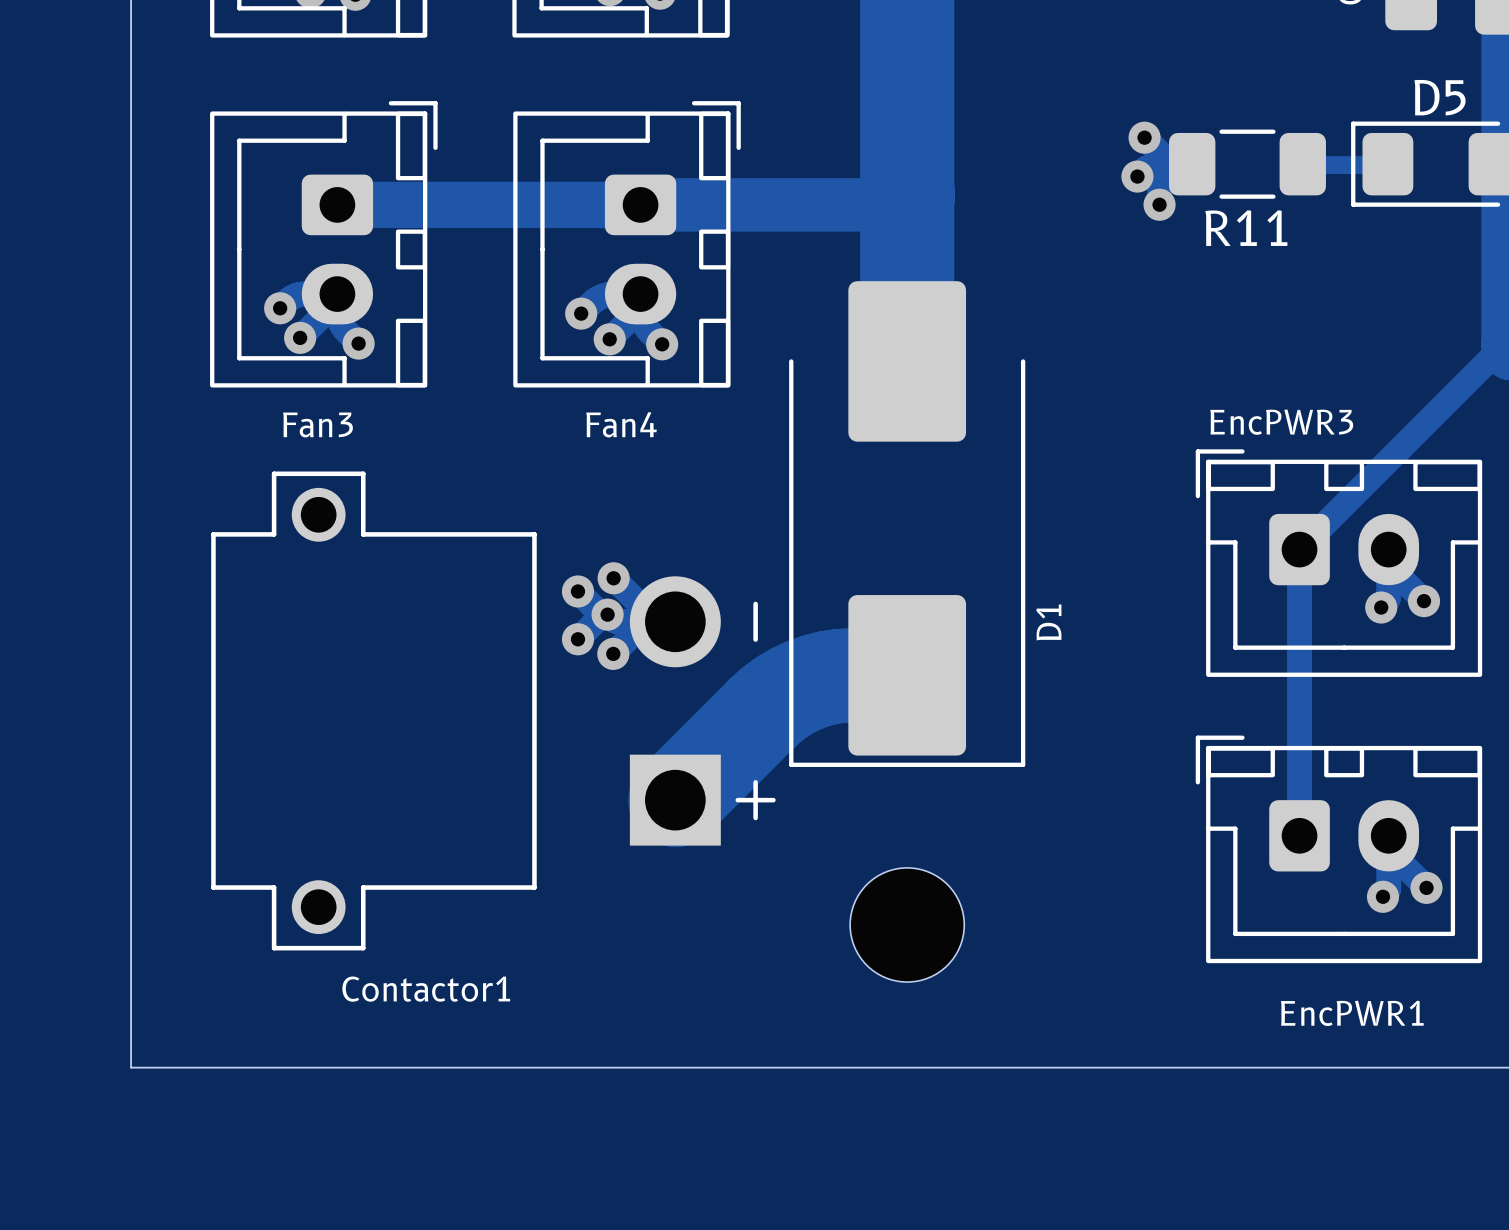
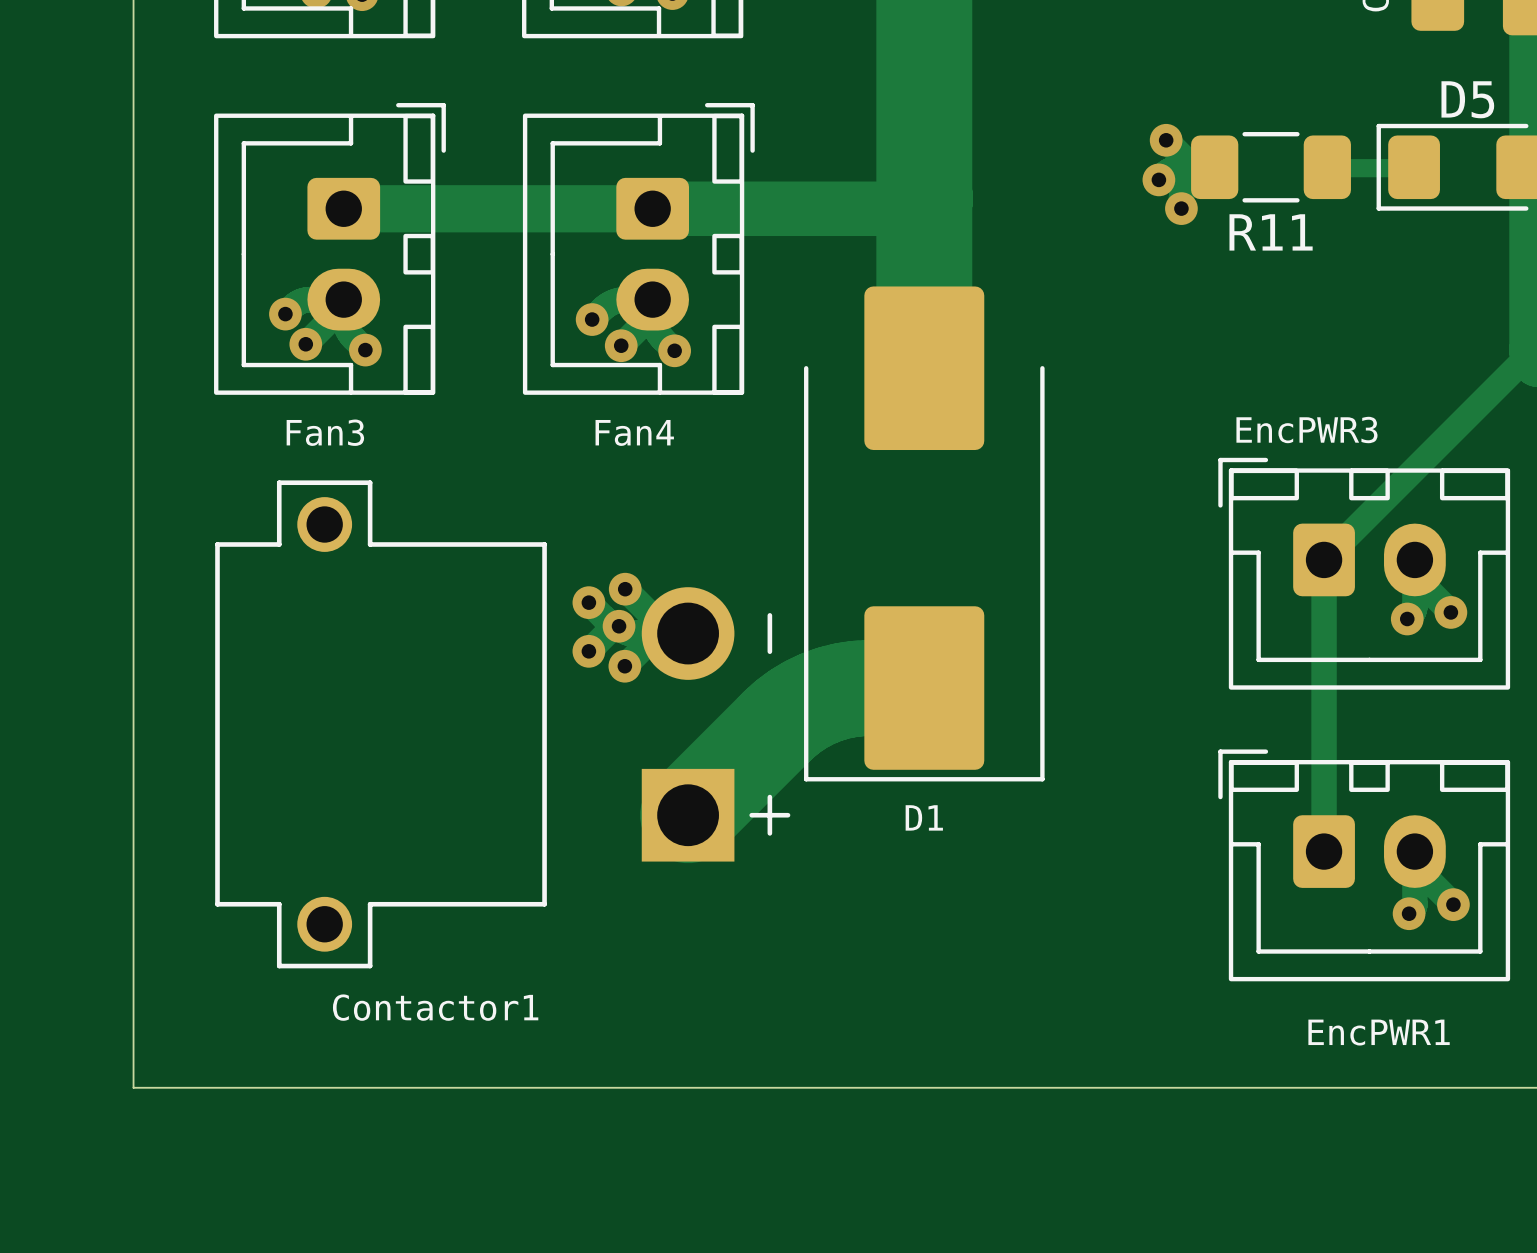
D1 name rotation: 0° (1048, 622) -> 90° clockwise (924, 817)
D1 name position: D1 (1048, 622) -> D1 (924, 817)
part: (907, 924) -> none

